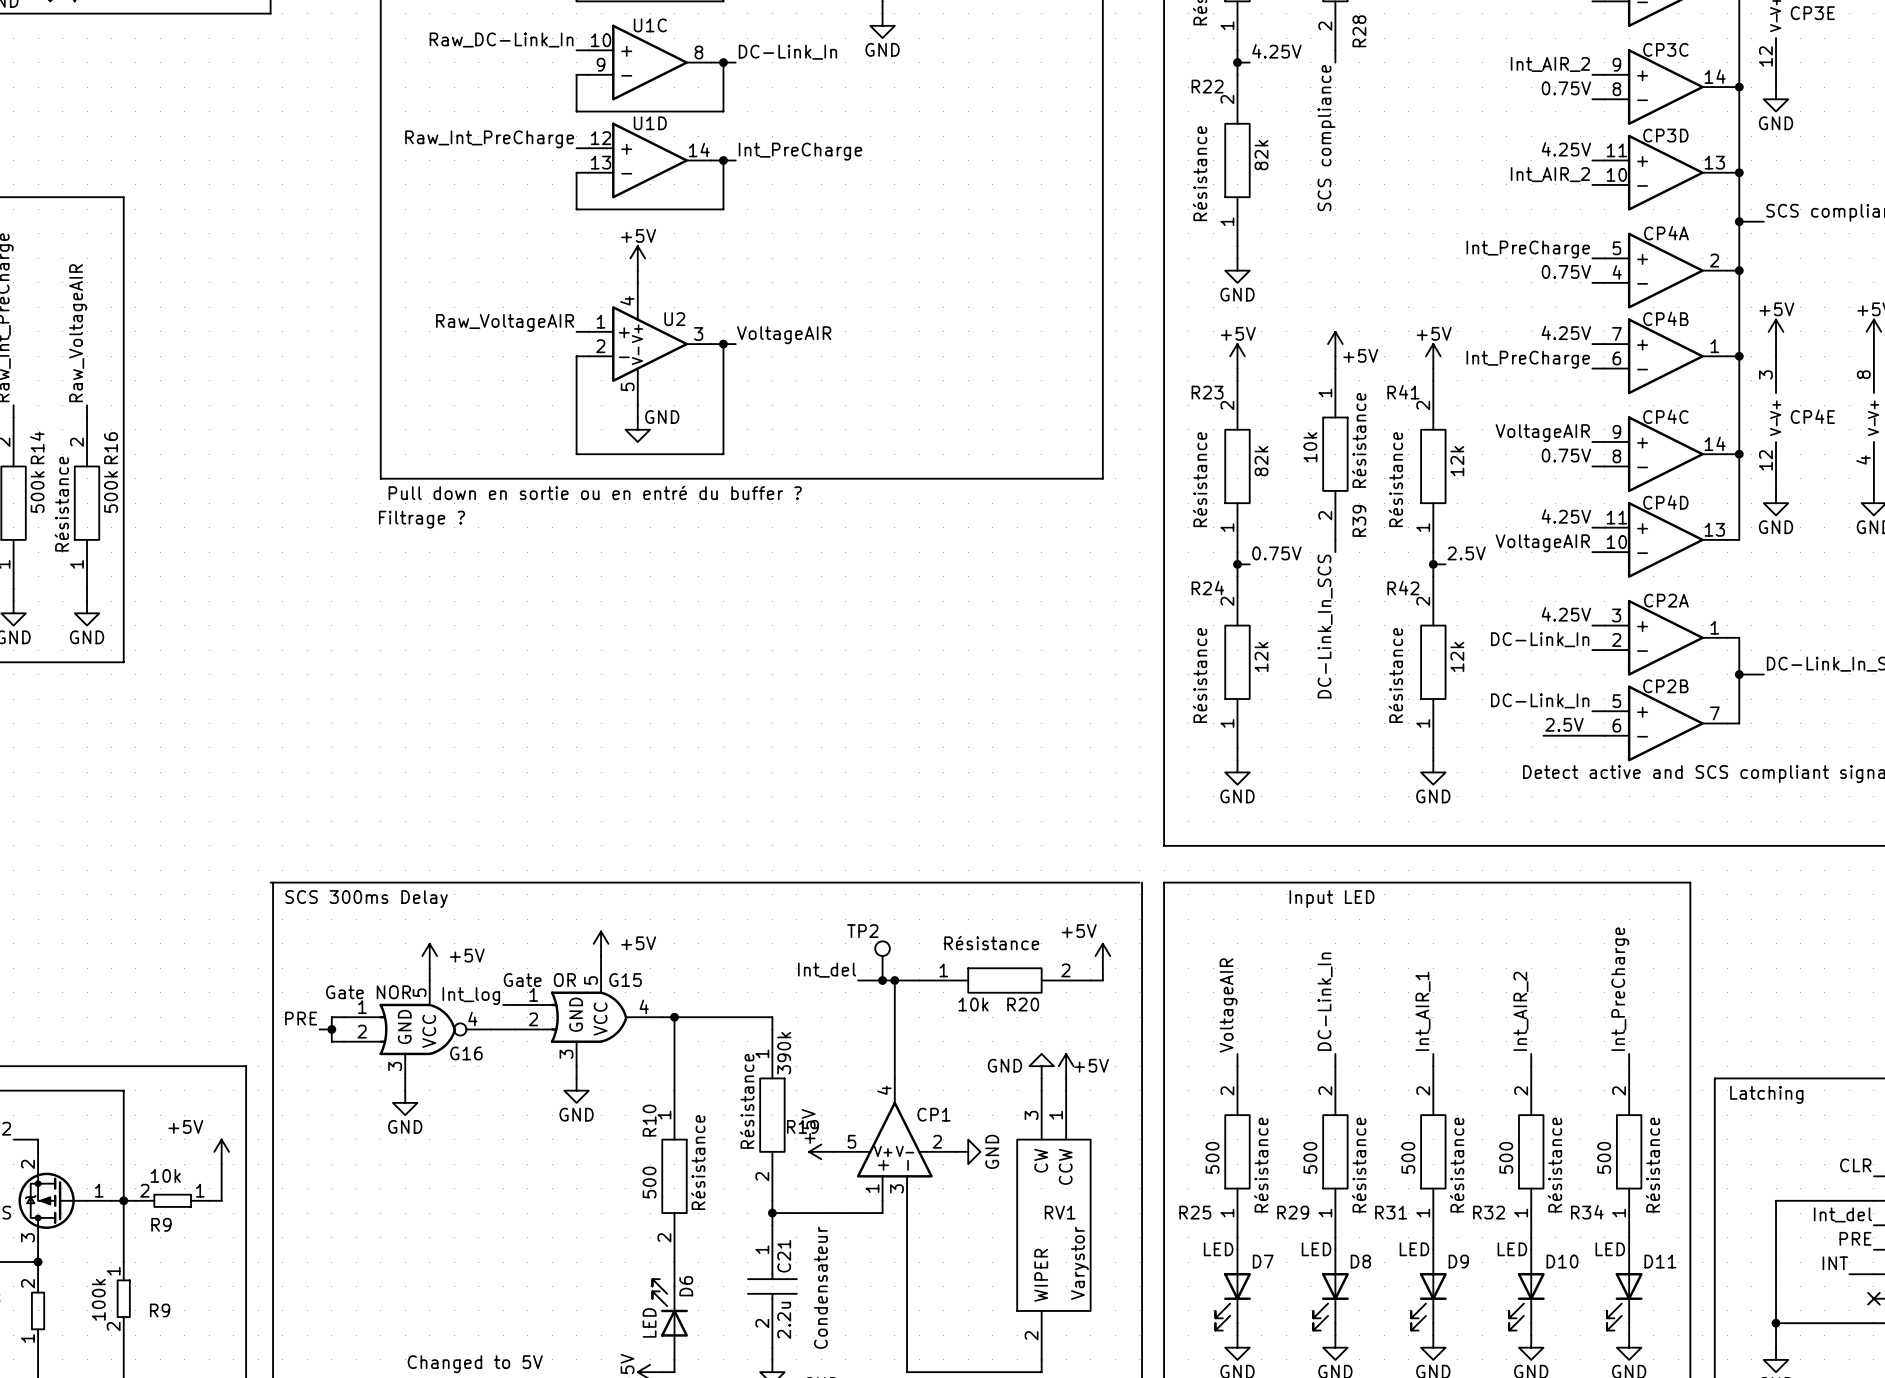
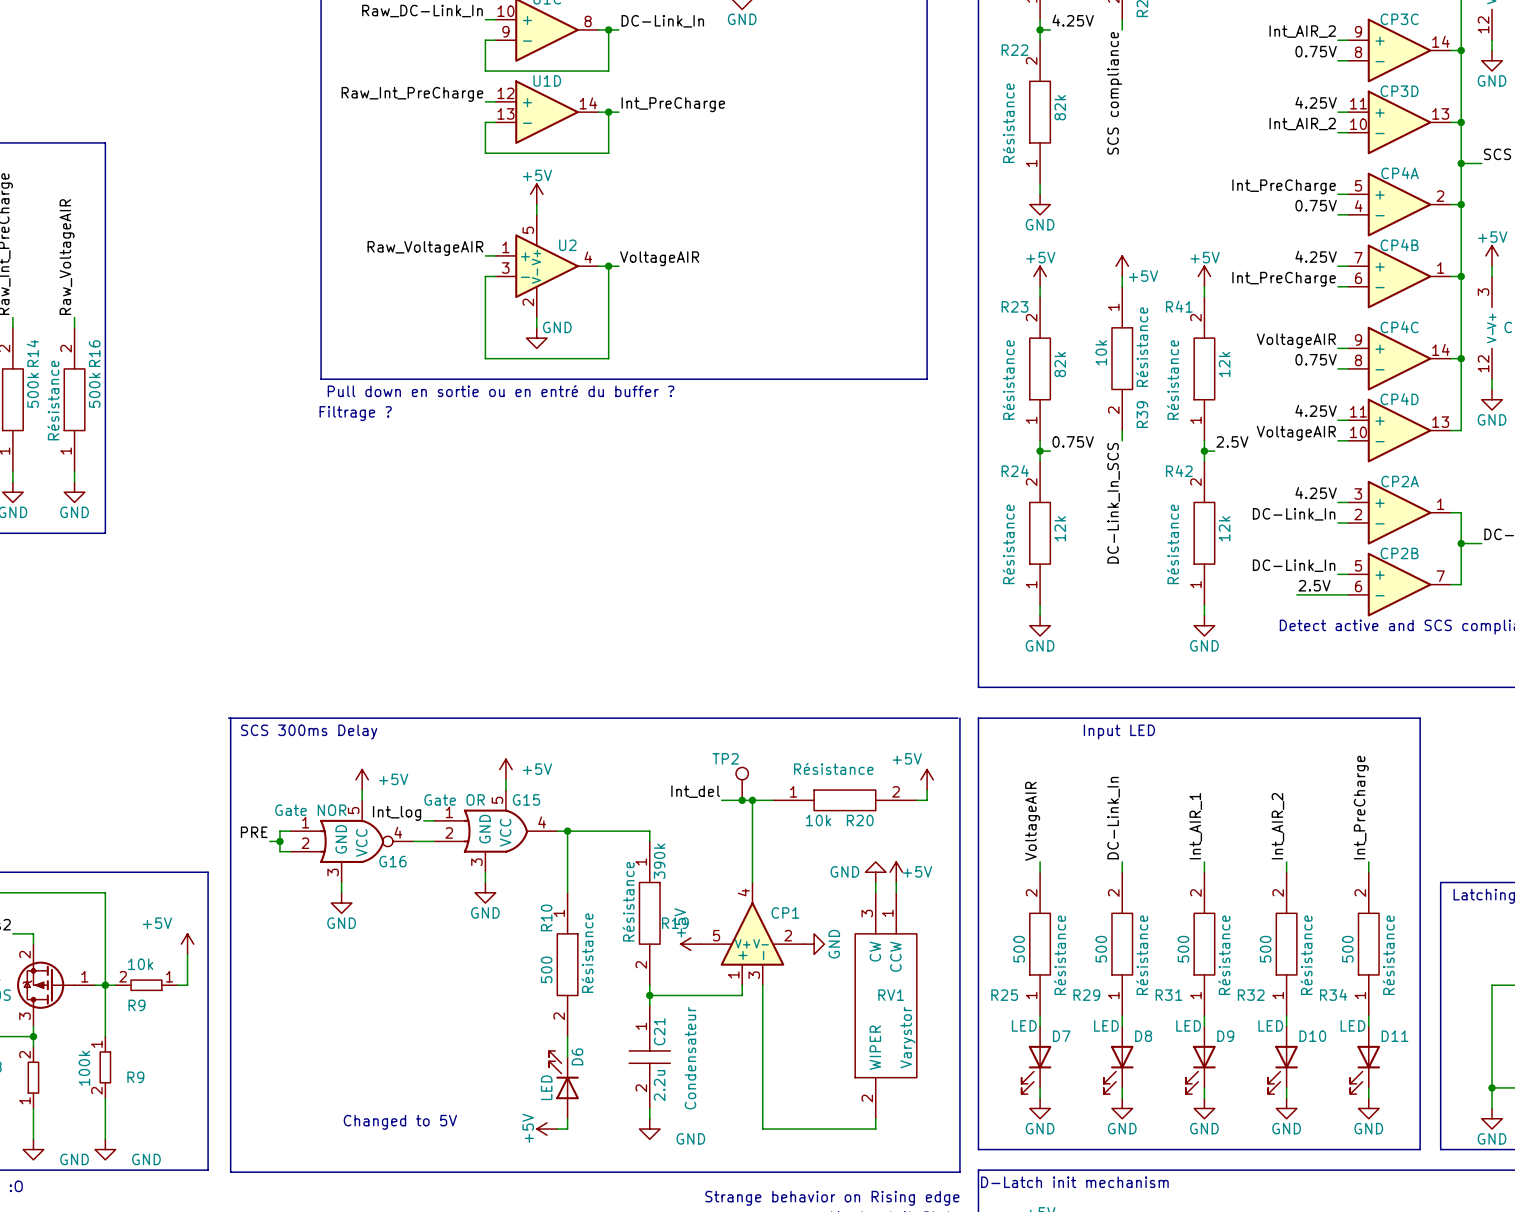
U2 pin number: 4 (627, 300) -> 5 (528, 230)
U2 pin number: 3 (698, 333) -> 4 (588, 257)
U2 pin number: 2 (600, 346) -> 3 (505, 268)
U2 pin number: 5 (627, 386) -> 2 (528, 302)

